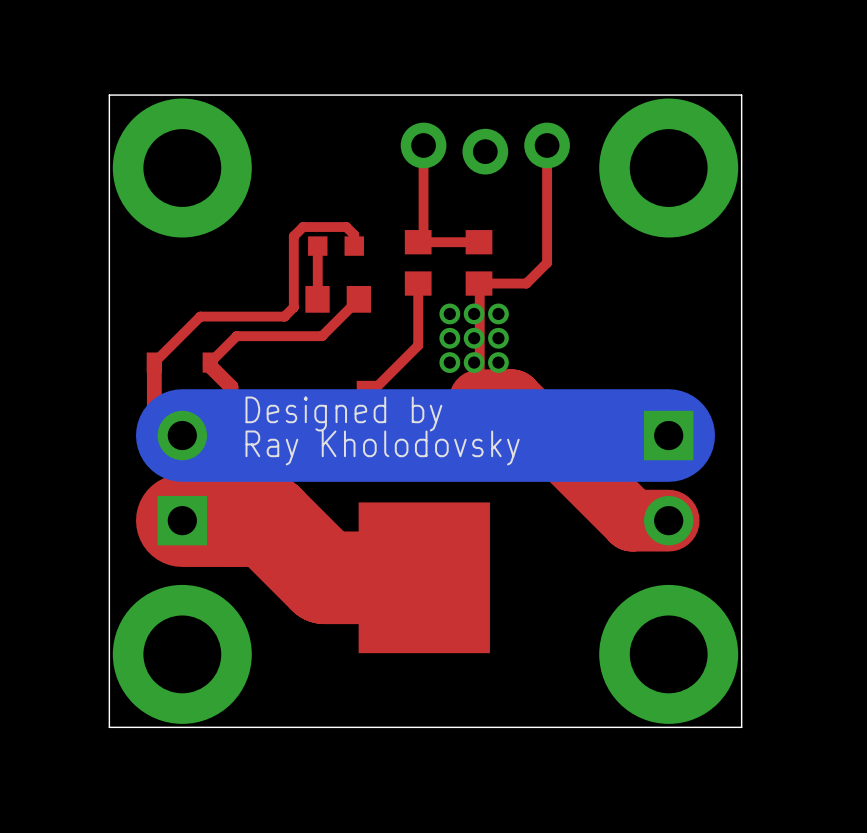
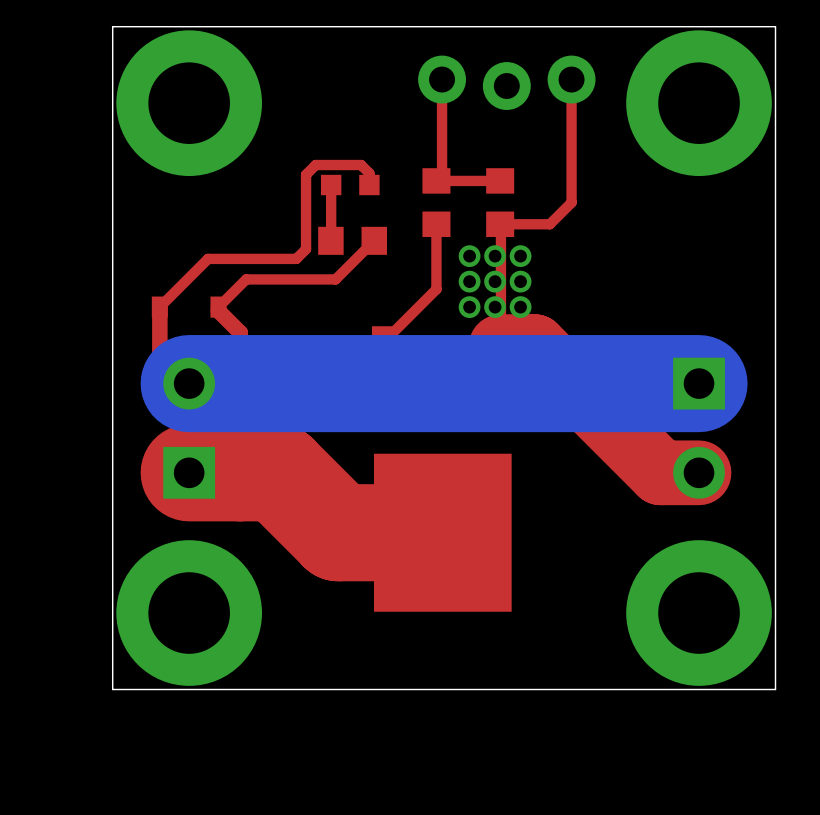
text: Designed by (343, 413) -> none
text: Ray Kholodovsky (382, 447) -> none

